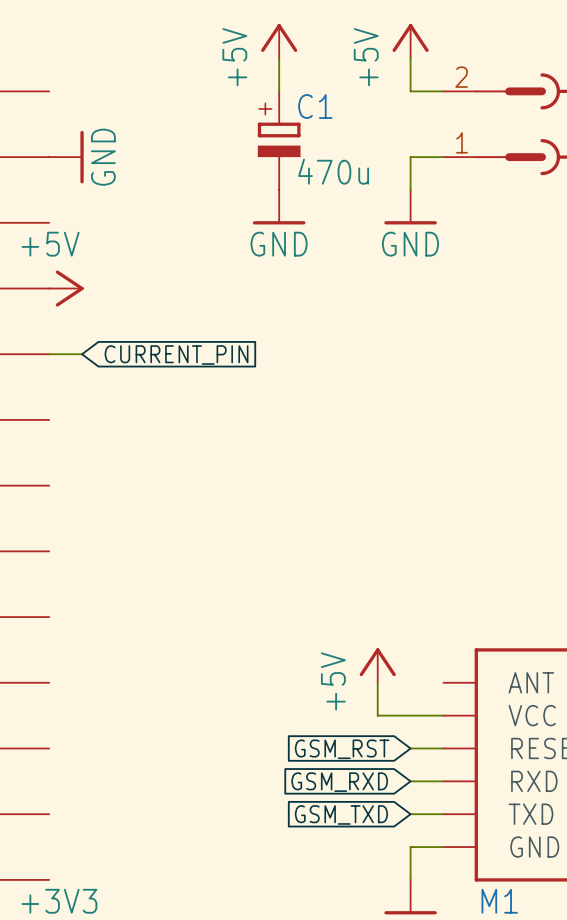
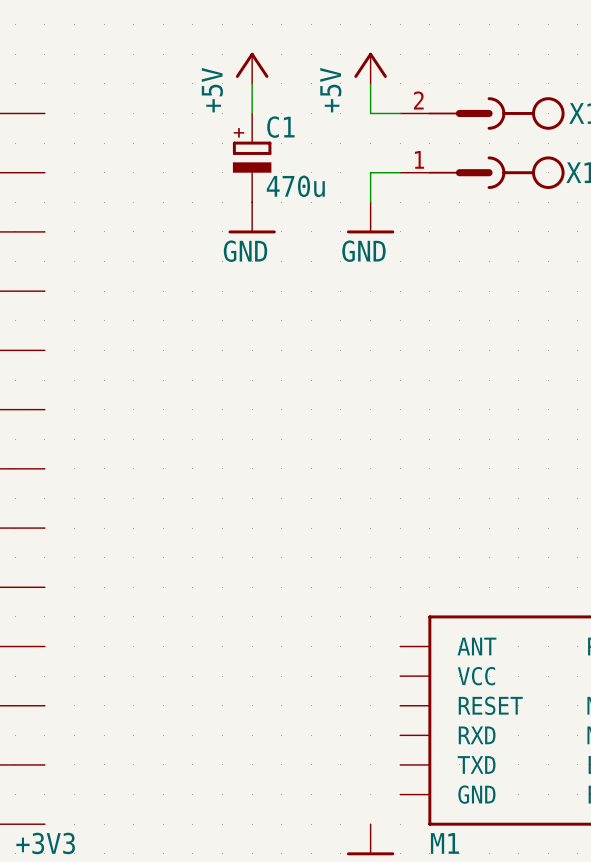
power symbol: GND (66, 157) -> none
power symbol: +5V (66, 288) -> none
wire: (49, 354) (82, 354) -> none
global label: CURRENT_PIN (176, 355) -> none
power symbol: +5V (377, 665) -> none
wire: (377, 682) (377, 715) (443, 715) -> none
wire: (410, 748) (443, 748) -> none
global label: GSM_RST (342, 749) -> none
wire: (410, 781) (443, 781) -> none
global label: GSM_RXD (339, 782) -> none
global label: GSM_TXD (341, 814) -> none
wire: (410, 814) (443, 814) -> none
wire: (443, 847) (410, 847) (410, 879) -> none

